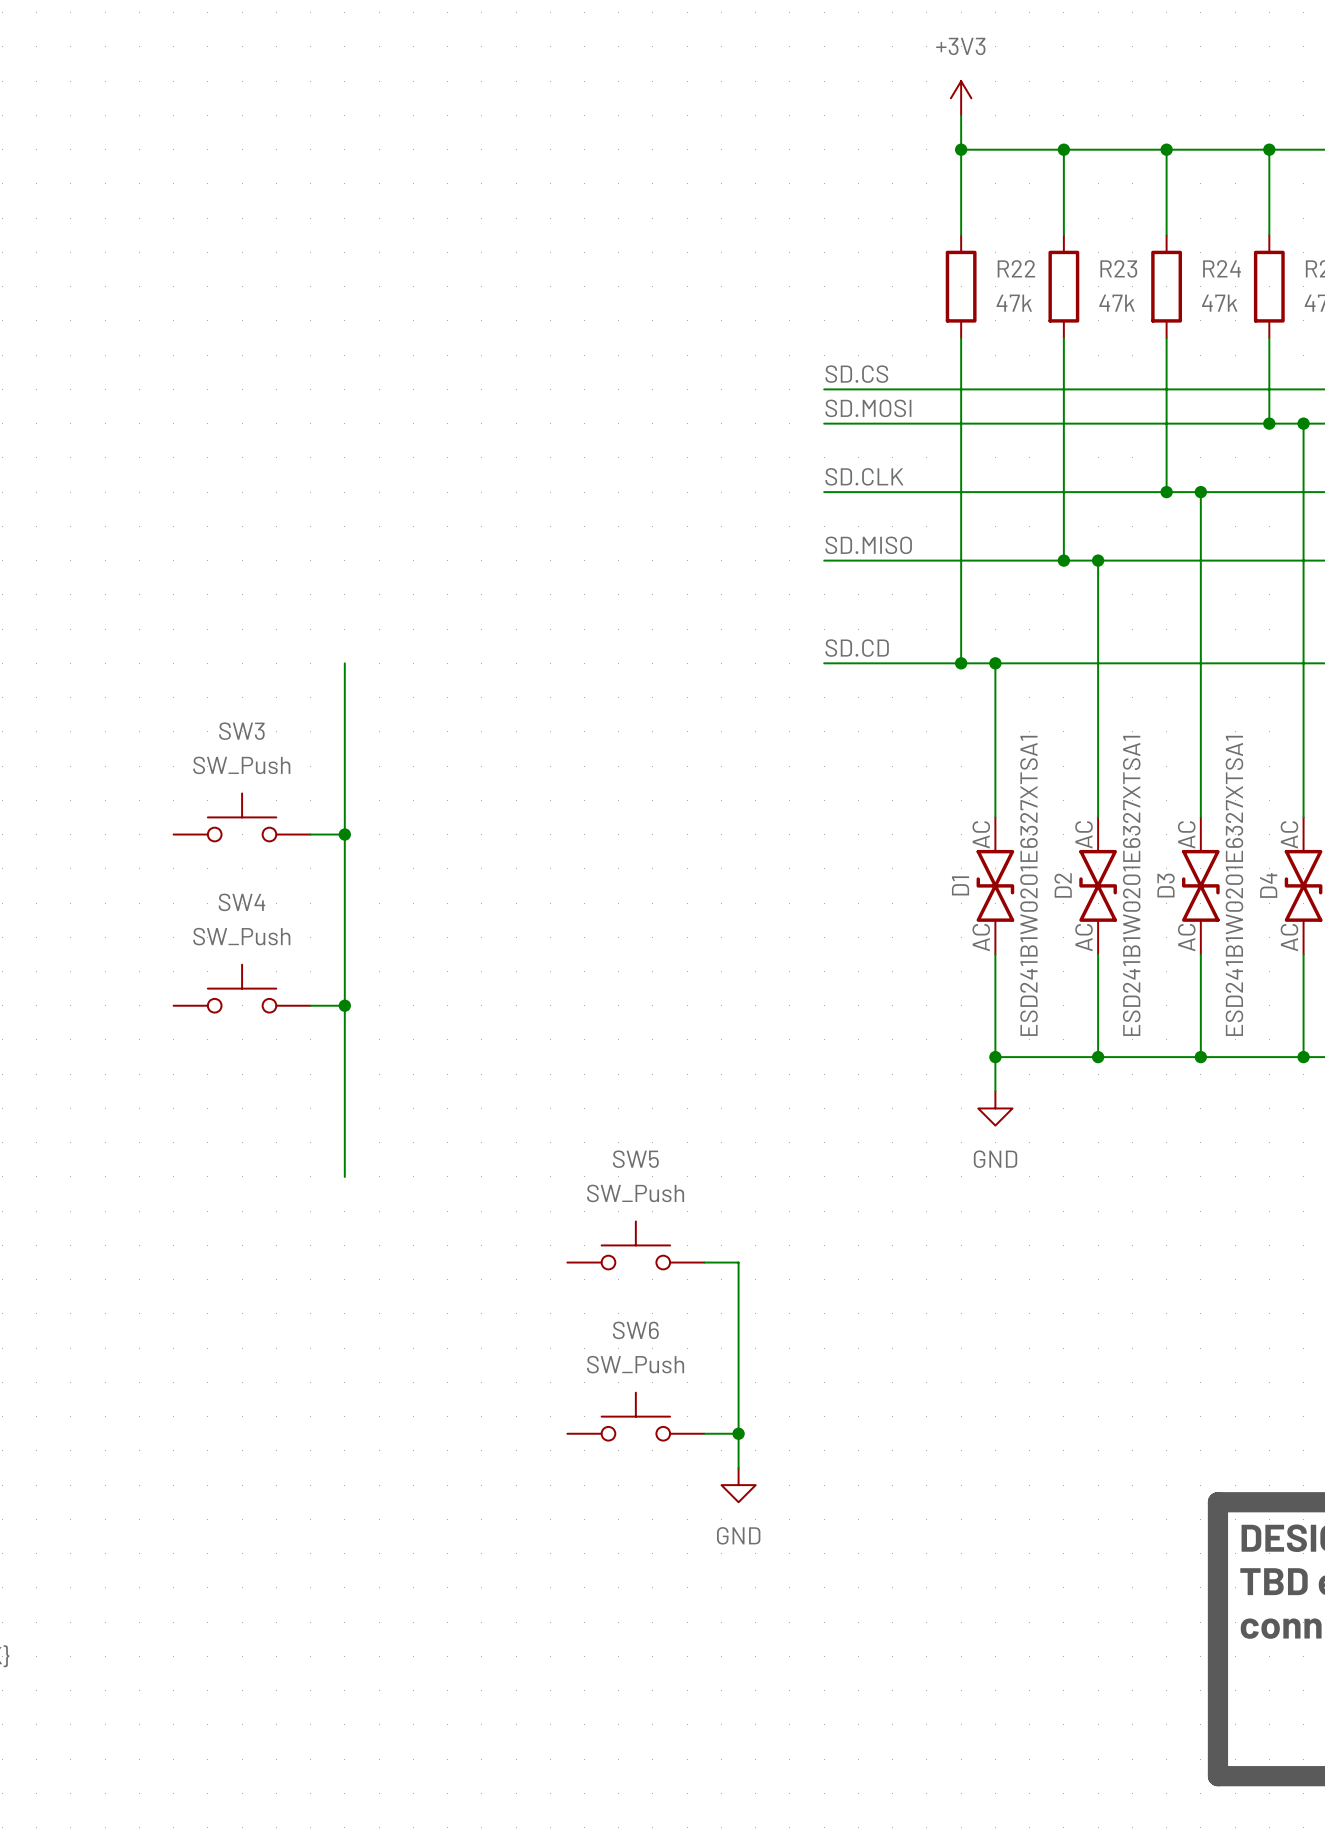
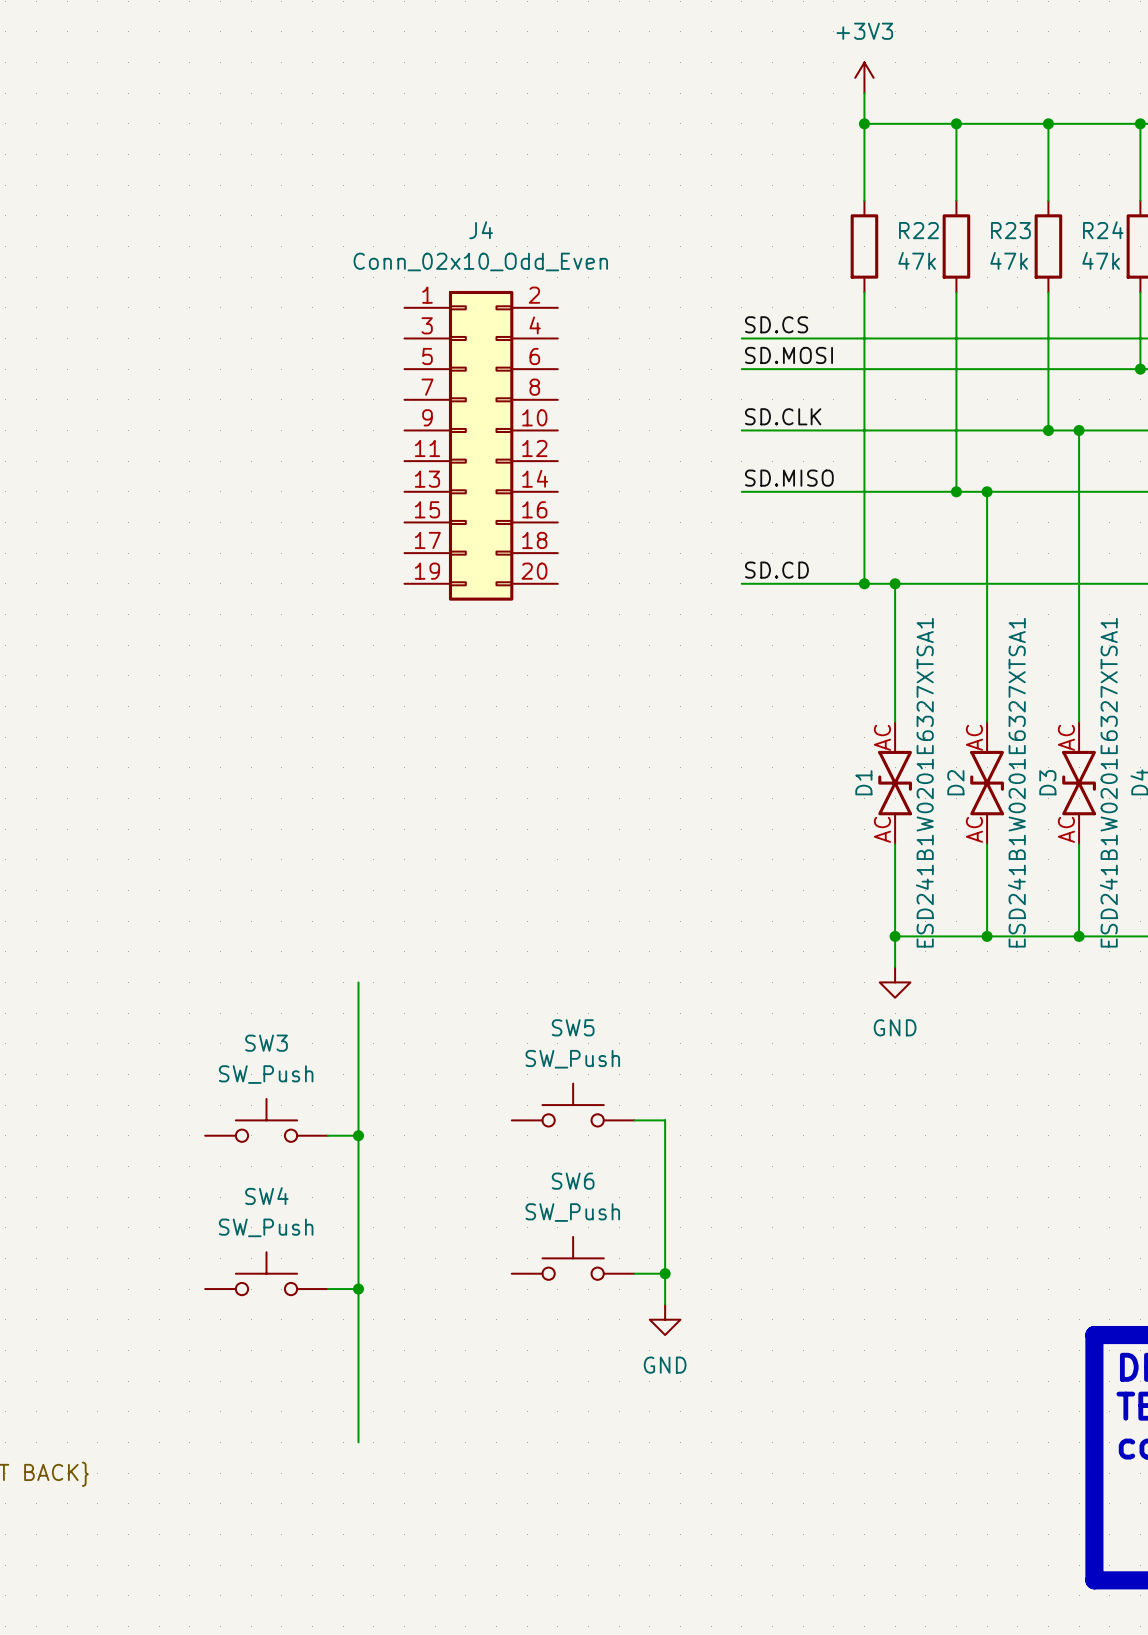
J4: none -> Conn_02x10_Odd_Even (481, 445)
wire: (344, 663) (344, 1176) -> none
SW3 position: (242, 817) -> (266, 1120)
wire: (310, 834) (344, 834) -> none
junction: (344, 834) -> none
SW4 position: (242, 988) -> (266, 1273)
wire: (310, 1005) (344, 1005) -> (327, 1135) (358, 1135)
junction: (344, 1005) -> none
wire: none -> (358, 982) (358, 1442)
junction: none -> (358, 1135)
wire: none -> (327, 1289) (358, 1289)
junction: none -> (358, 1289)

